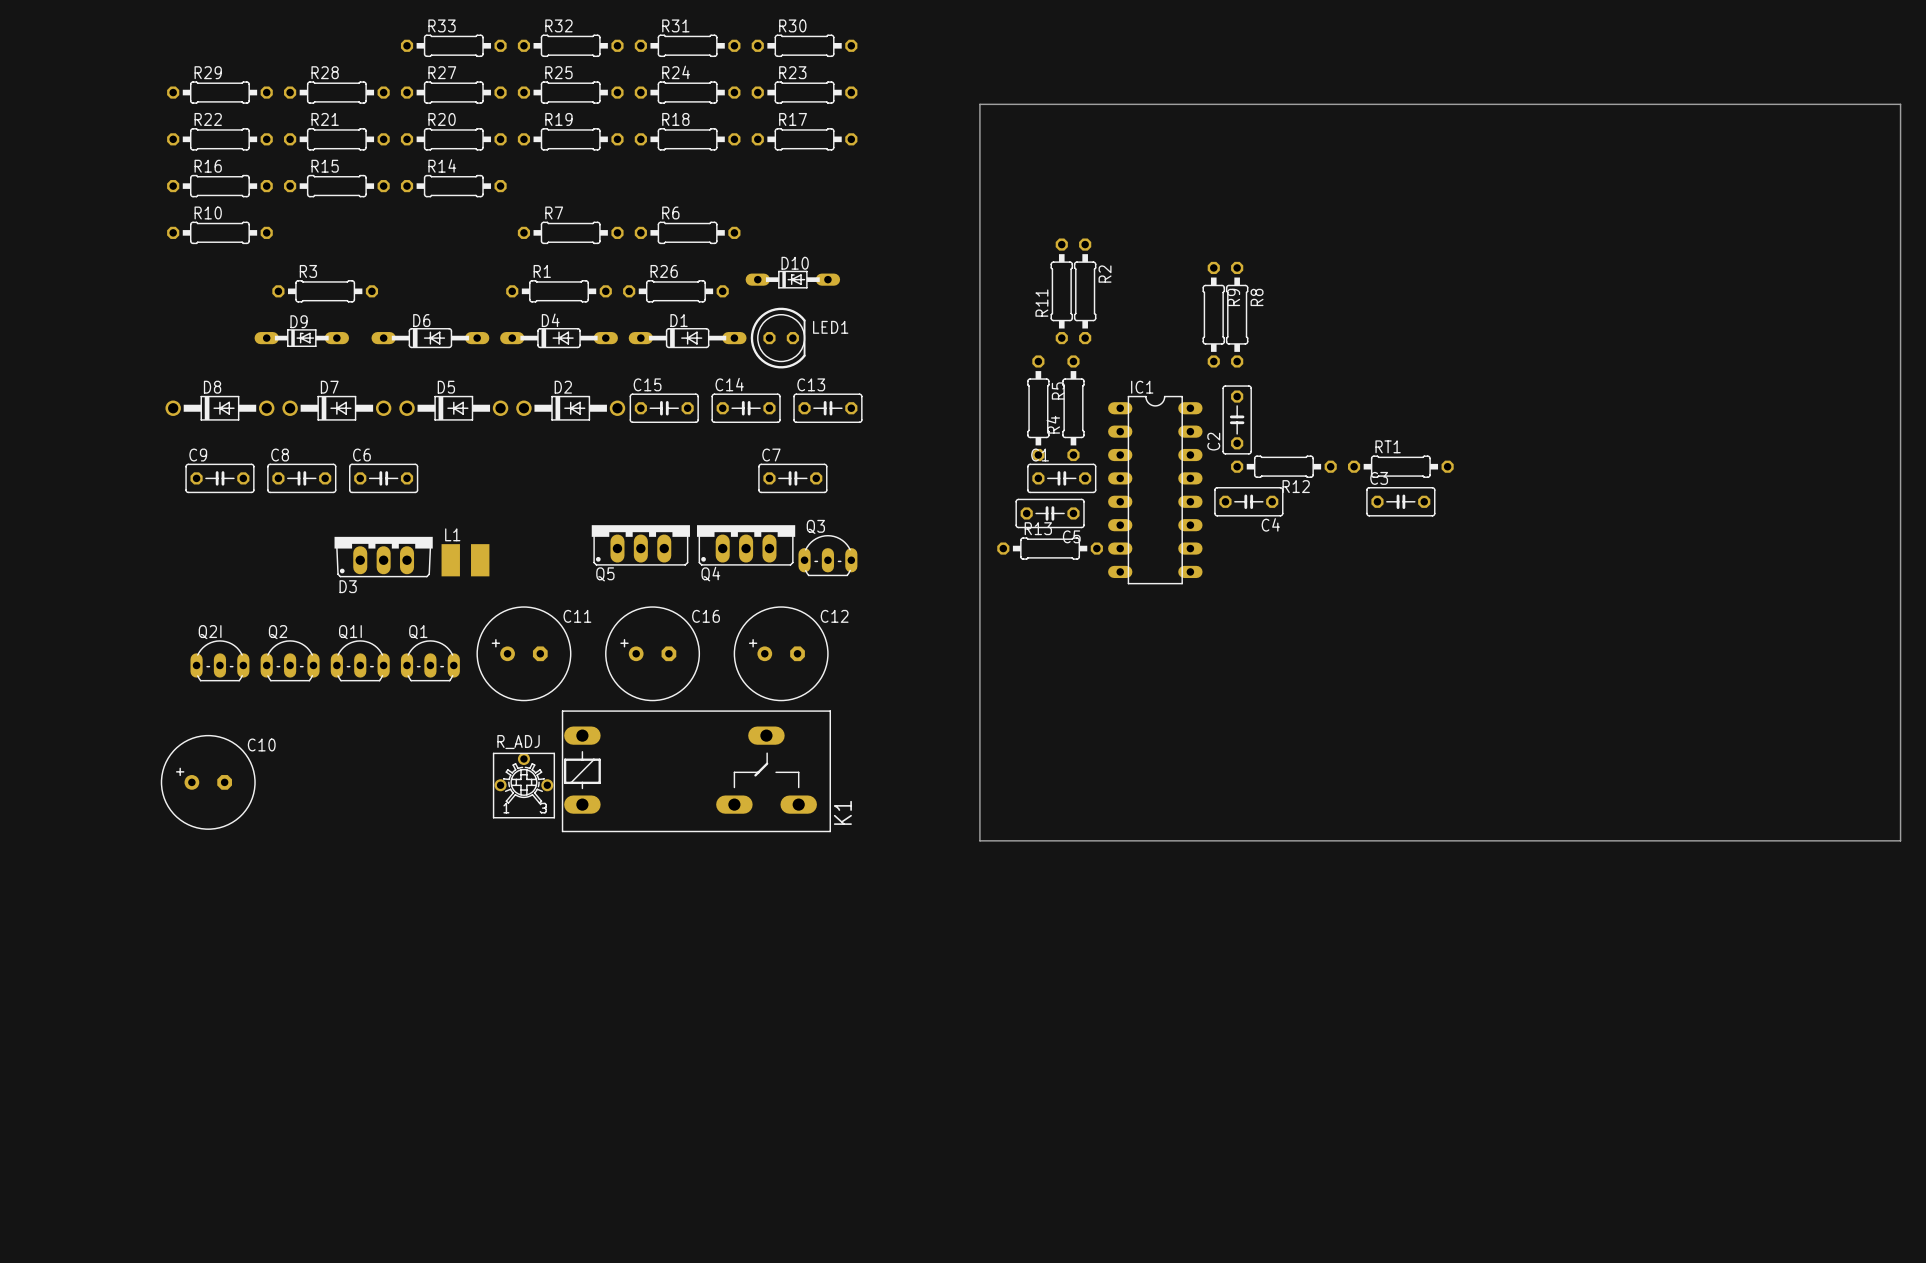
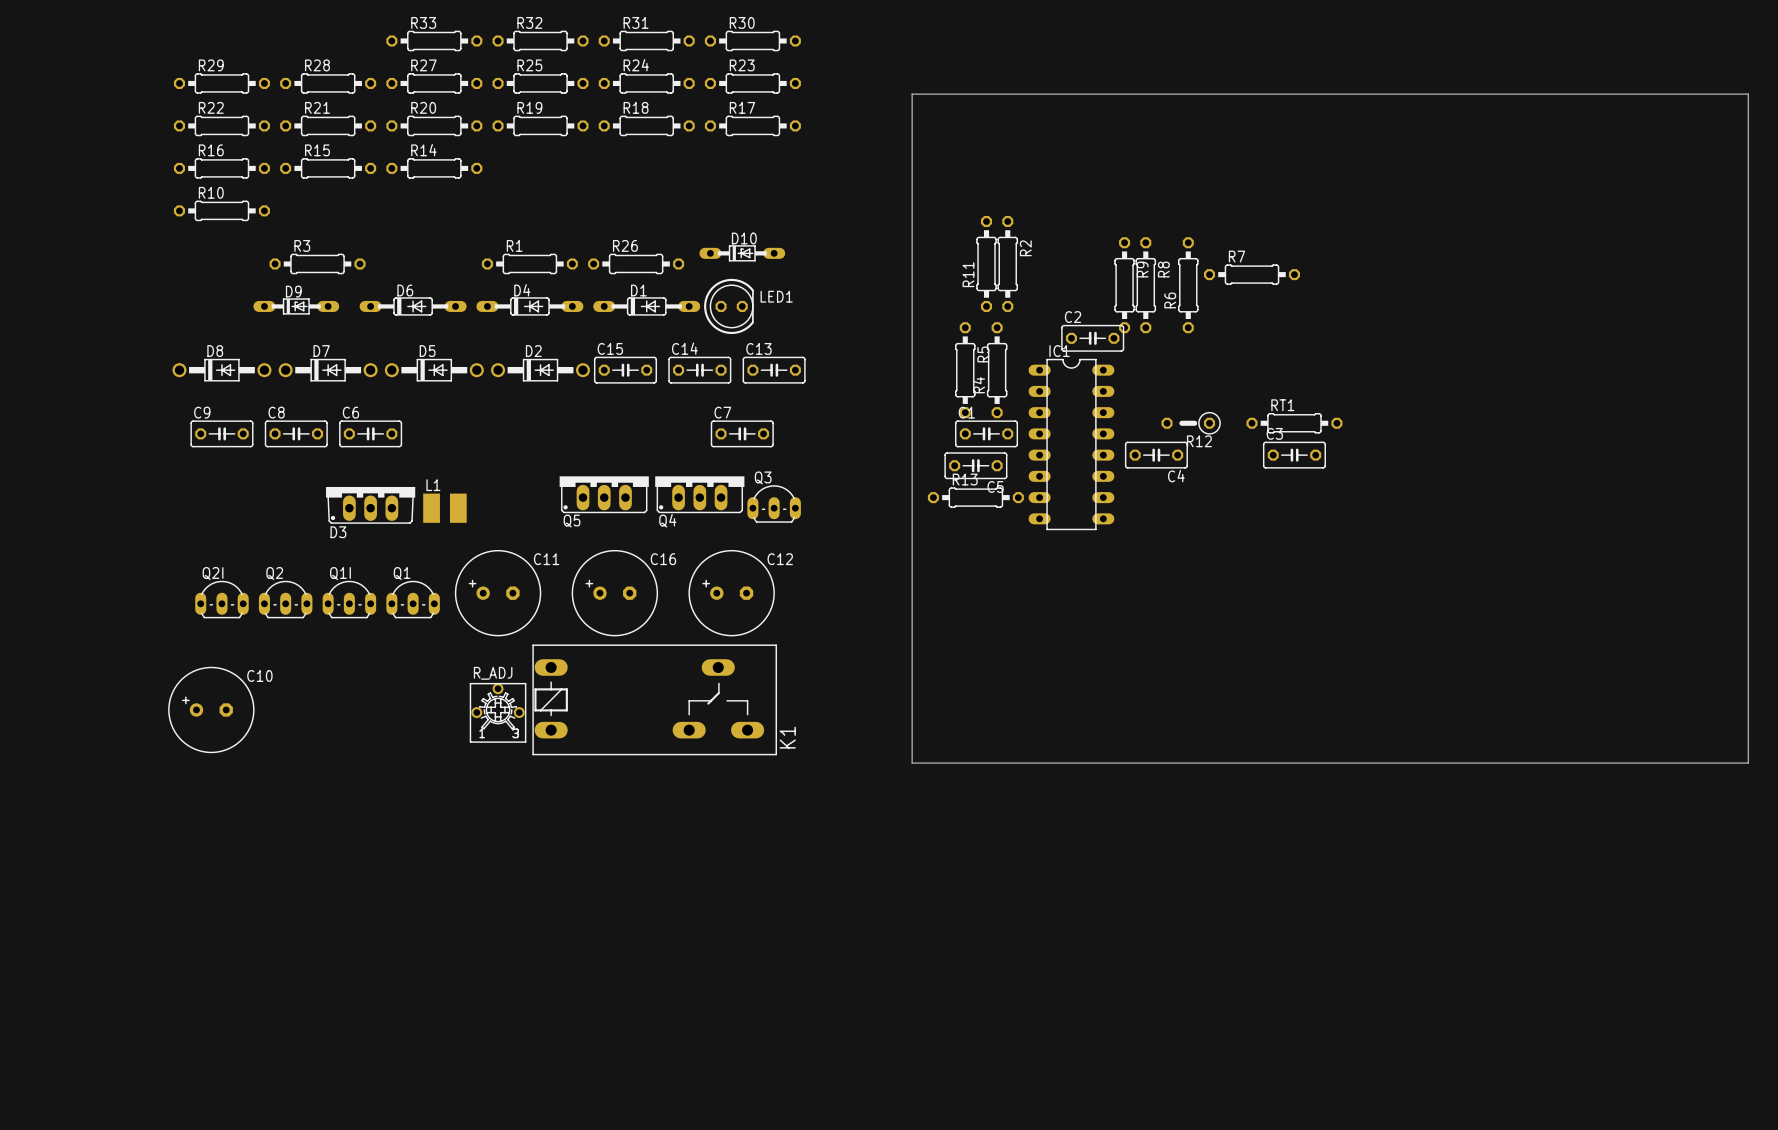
R6 name position: R6 (670, 212) -> R6 (1170, 300)
R7 position: (570, 232) -> (1251, 274)
R6 rotation: 0° (687, 232) -> 90° clockwise (1188, 285)
R6 position: (687, 232) -> (1188, 285)
C2 rotation: 0° (1237, 419) -> 90° clockwise (1092, 338)
C2 position: (1237, 419) -> (1092, 338)
R12 footprint: [1231, 455, 1337, 478] -> [1161, 412, 1221, 435]

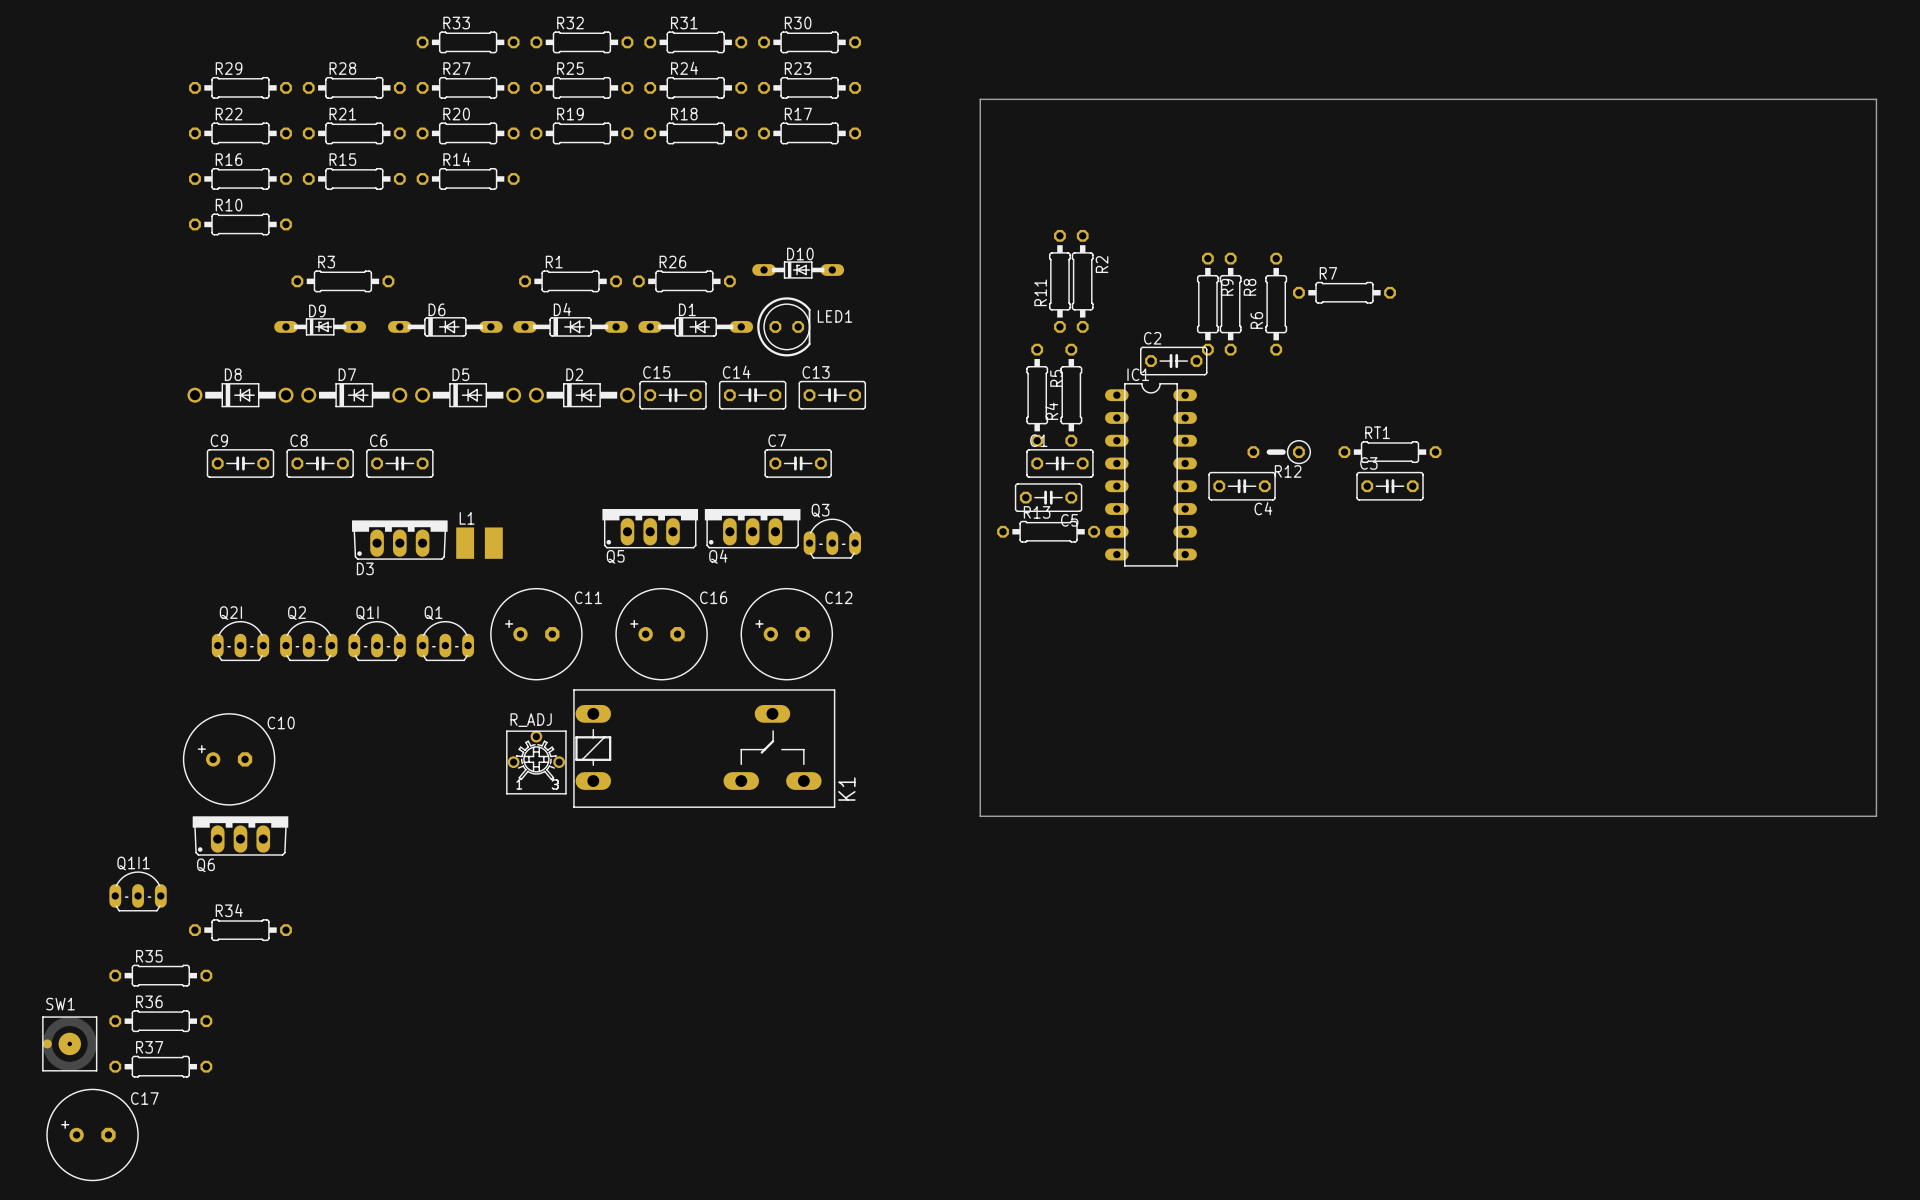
Q6: none -> (240, 835)
Q1I1: none -> (138, 891)
R34: none -> (240, 930)
R35: none -> (160, 975)
R36: none -> (160, 1021)
SW1: none -> (69, 1043)
R37: none -> (160, 1066)
C17: none -> (92, 1134)

